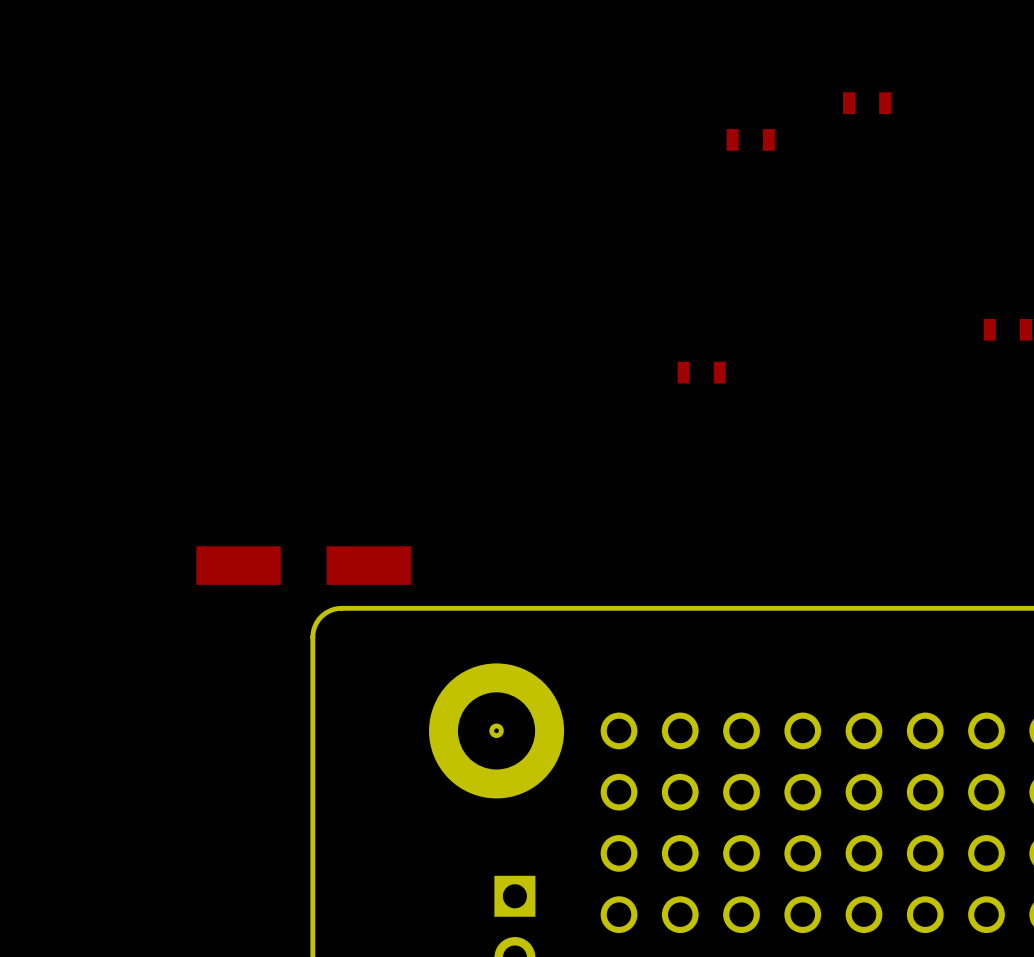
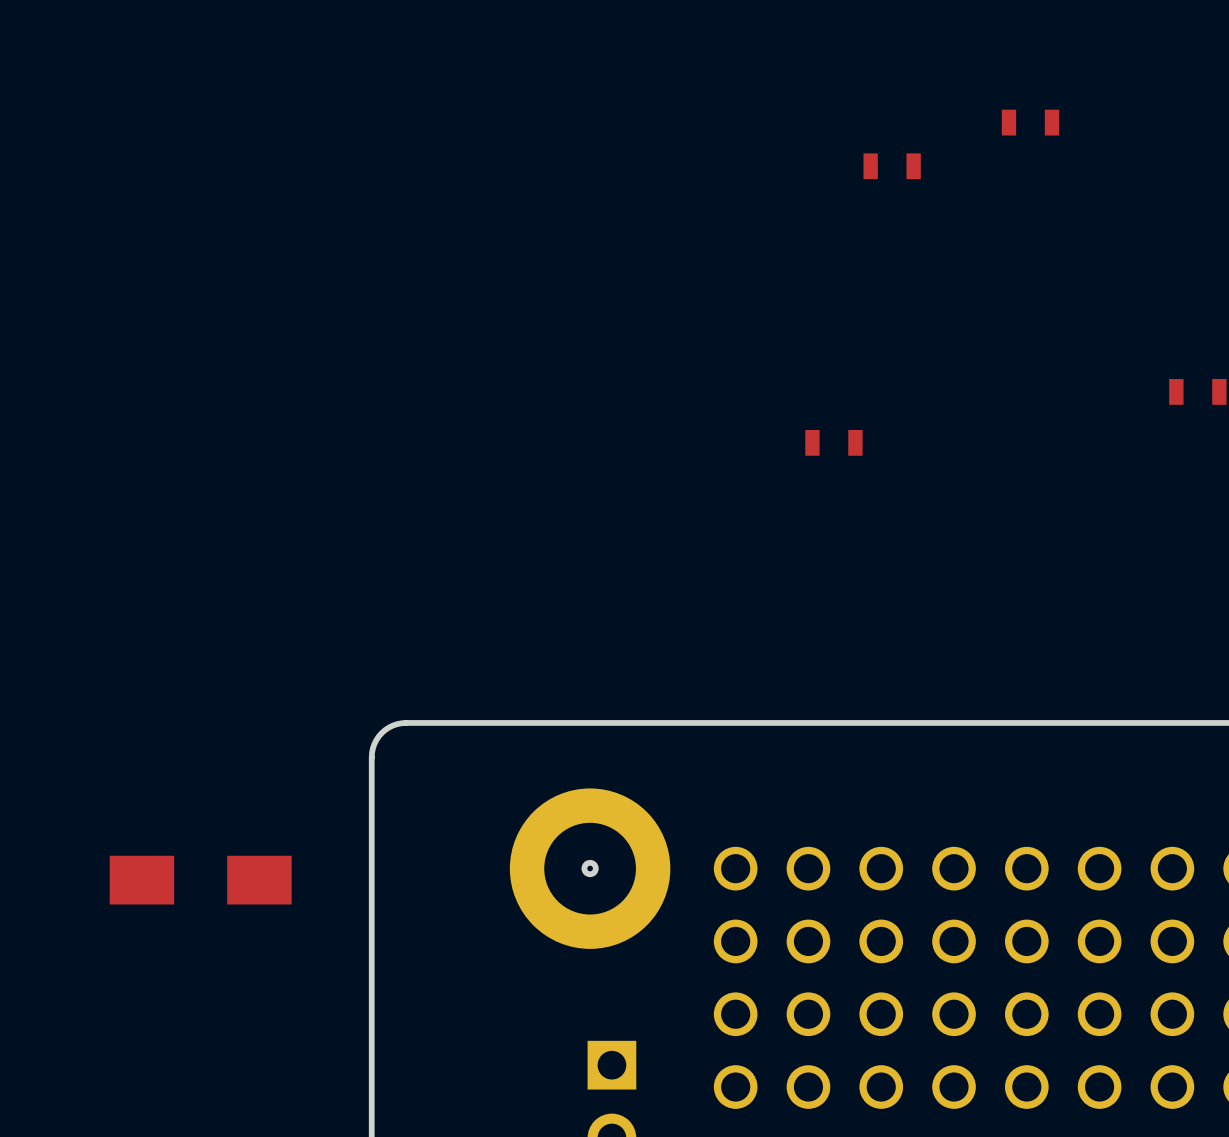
part: (303, 565) -> none
part: none -> (200, 880)

